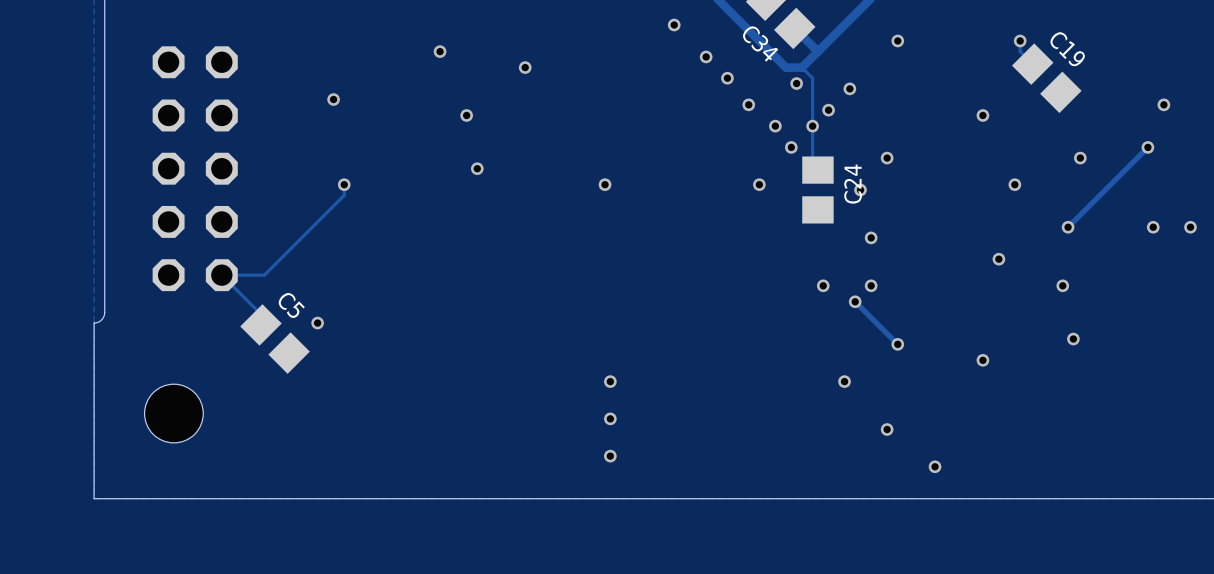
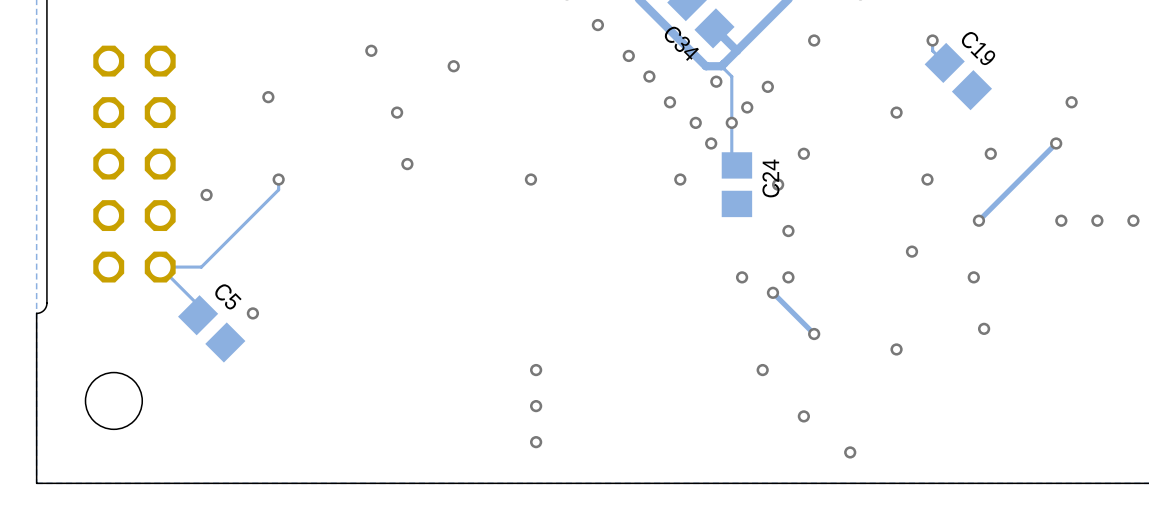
via: none -> (206, 194)

